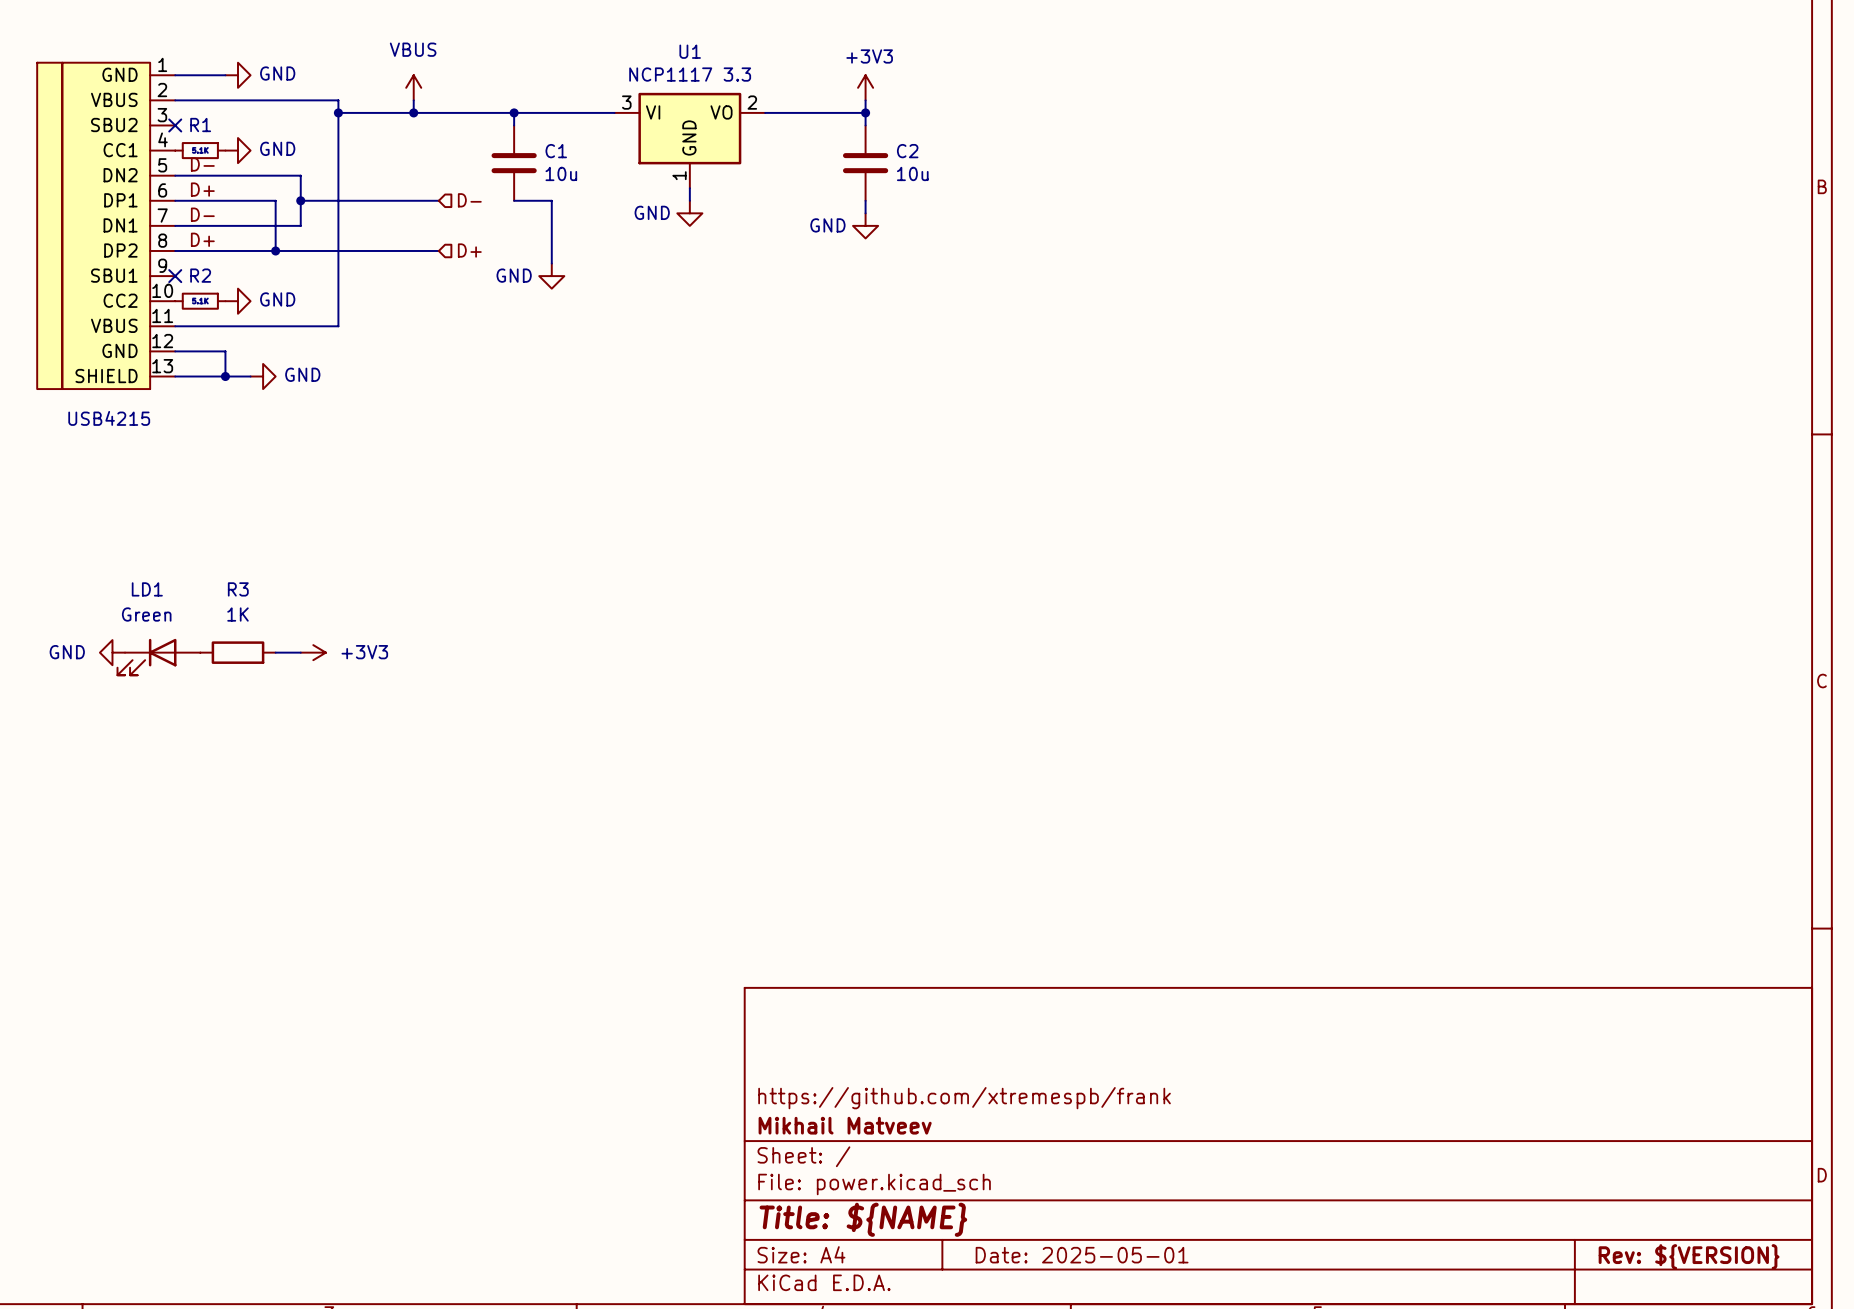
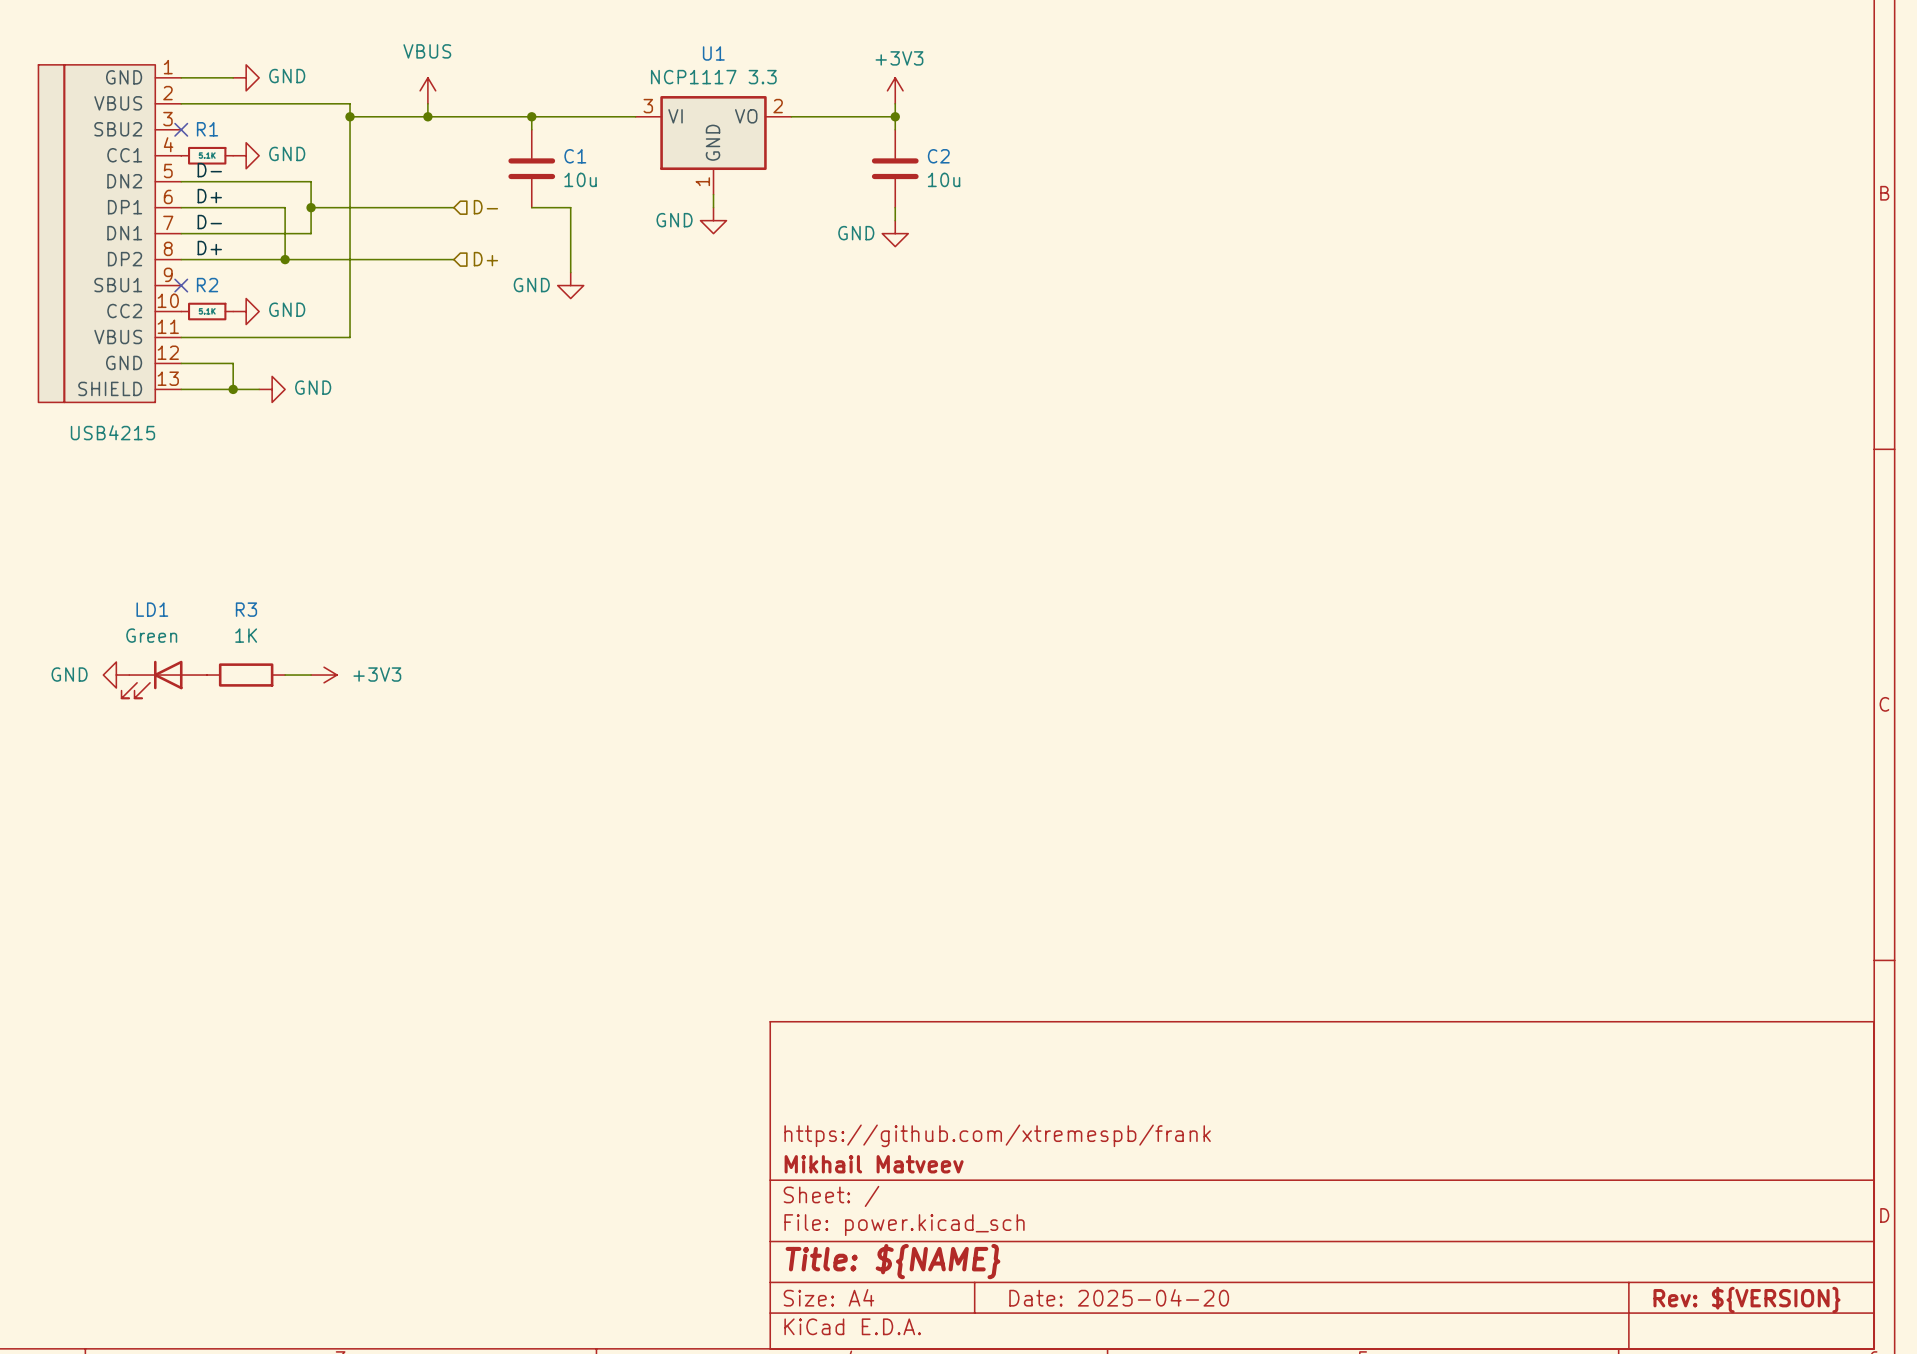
title block: Date: 2025-05-01 (1082, 1255) -> Date: 2025-04-20 (1119, 1297)

